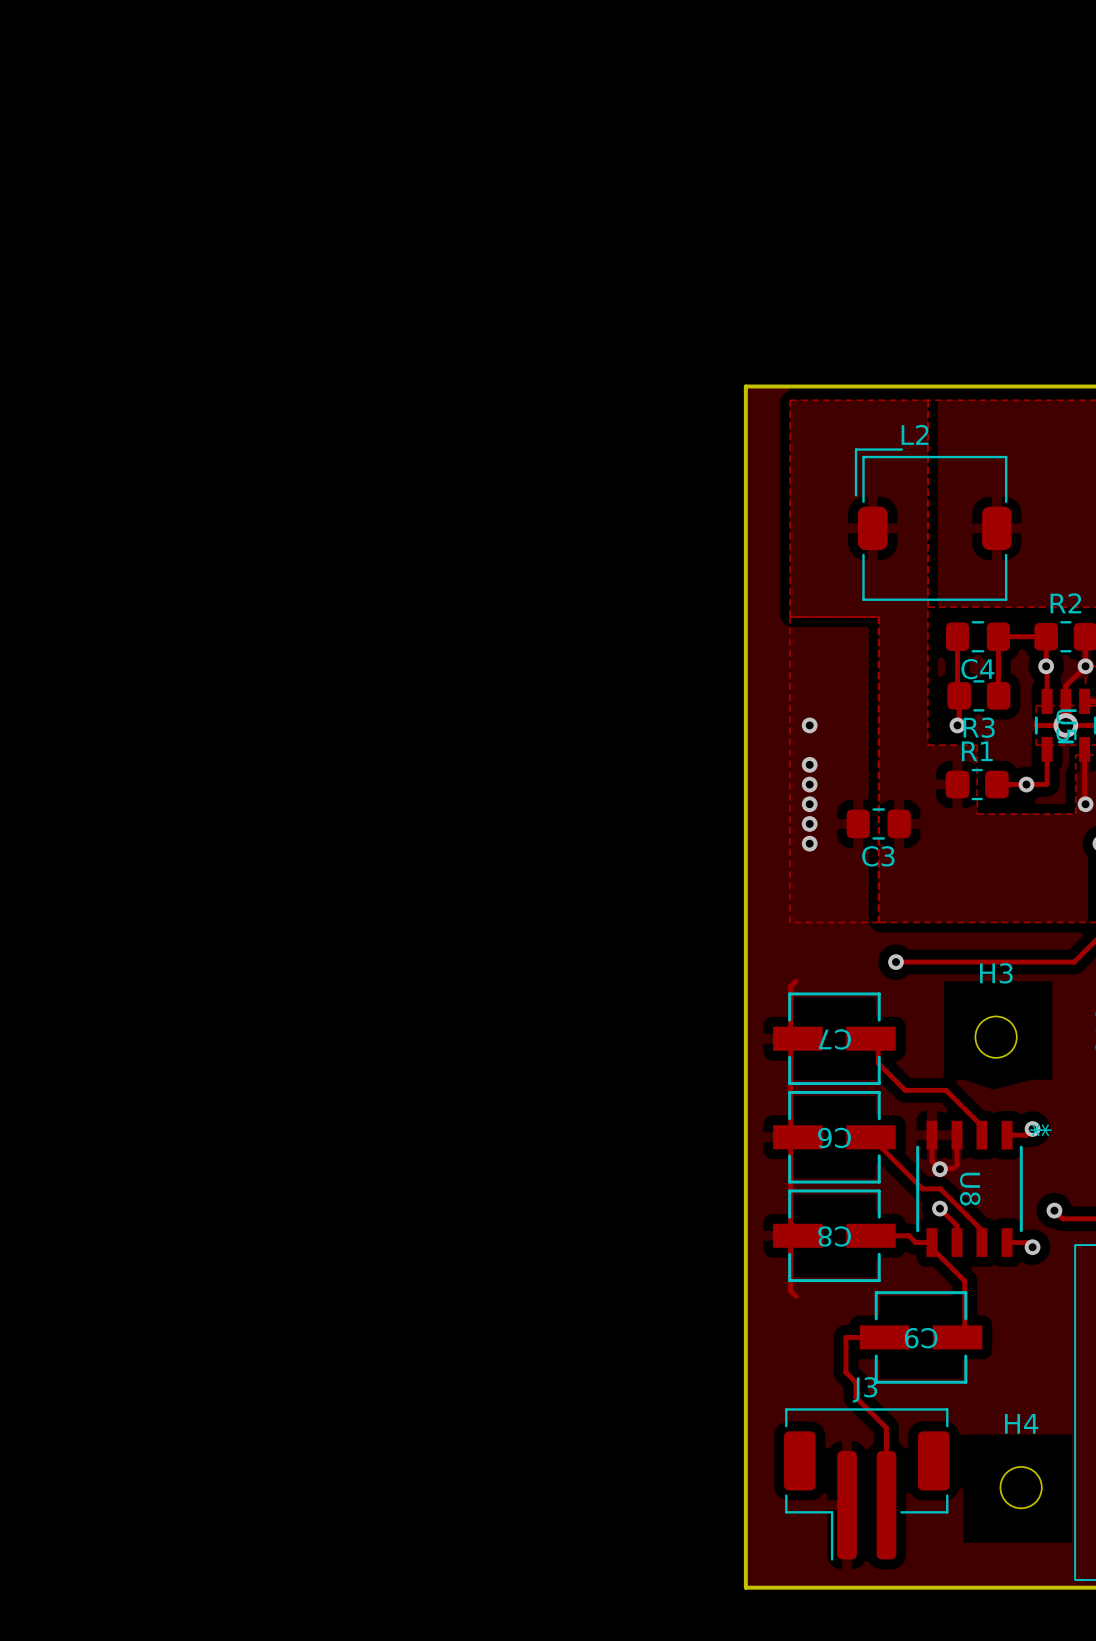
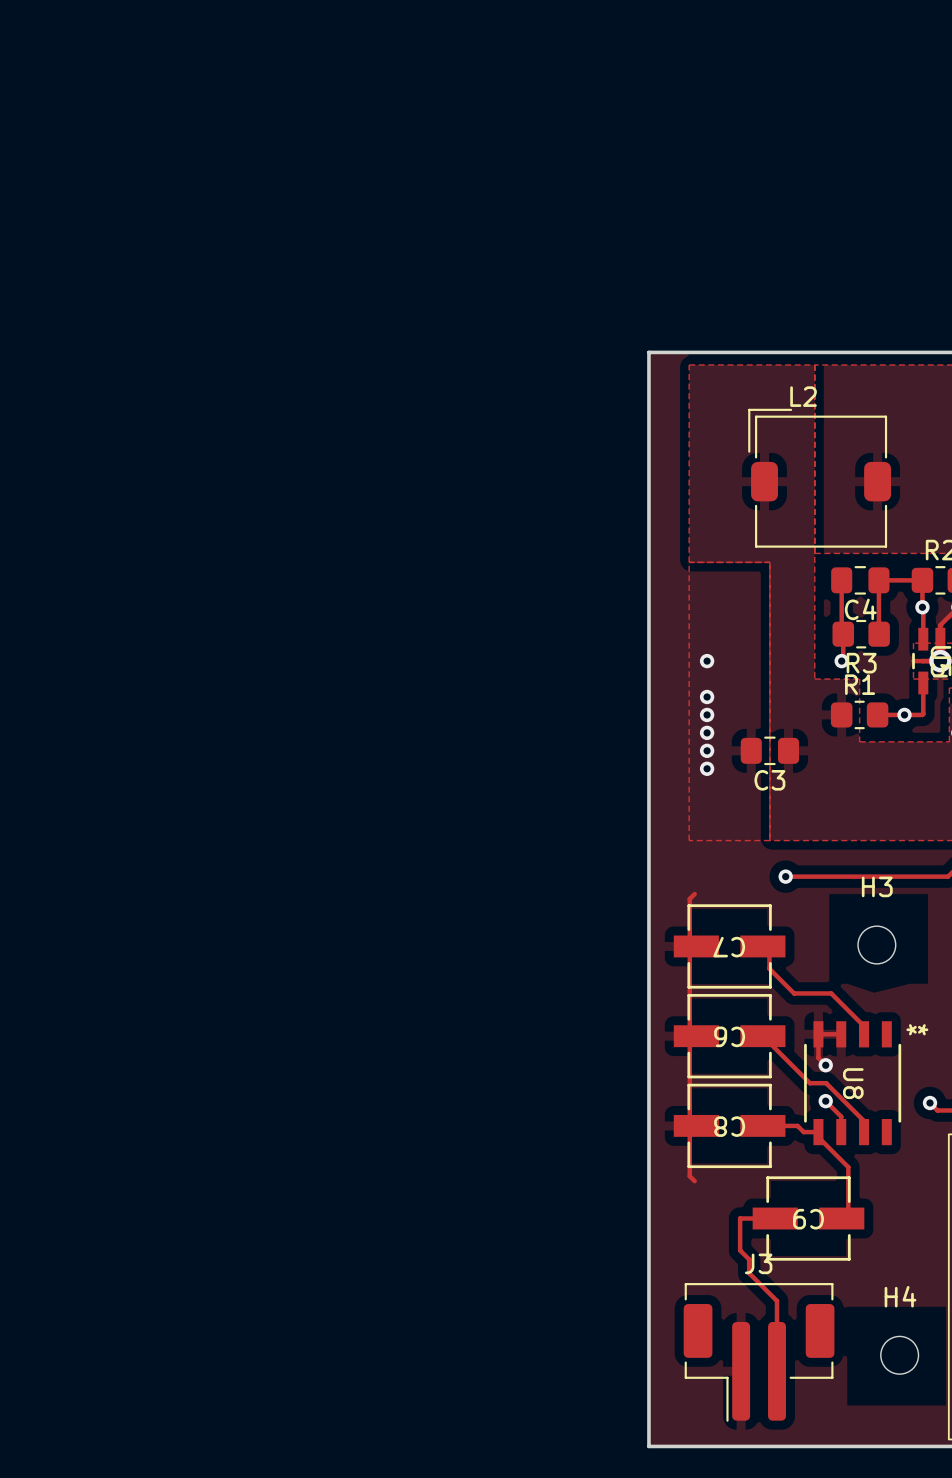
track: (1032, 1128) (1026, 1135) (1007, 1135) -> none
via: (1032, 1128) -> none
track: (956, 1135) (956, 1165) (953, 1168) (939, 1169) -> (841, 1034) (818, 1034)
track: (1007, 1242) (1027, 1242) (1032, 1247) -> none
via: (1032, 1247) -> none

